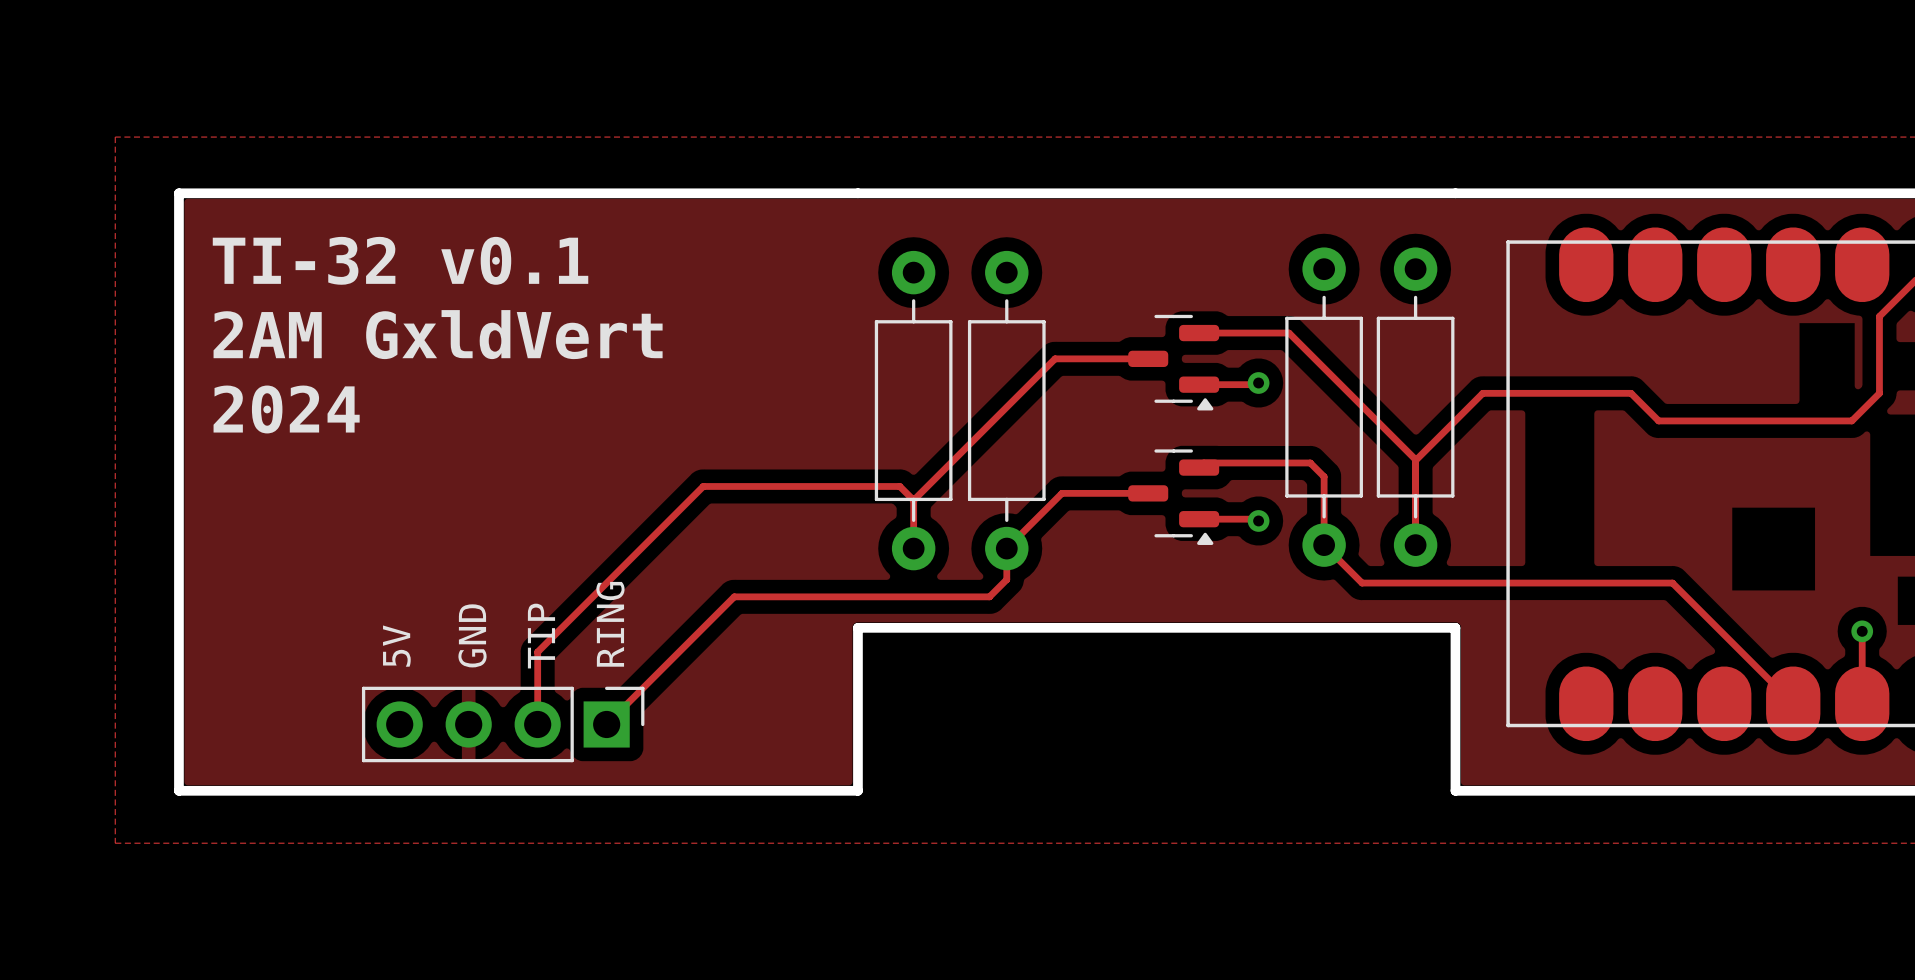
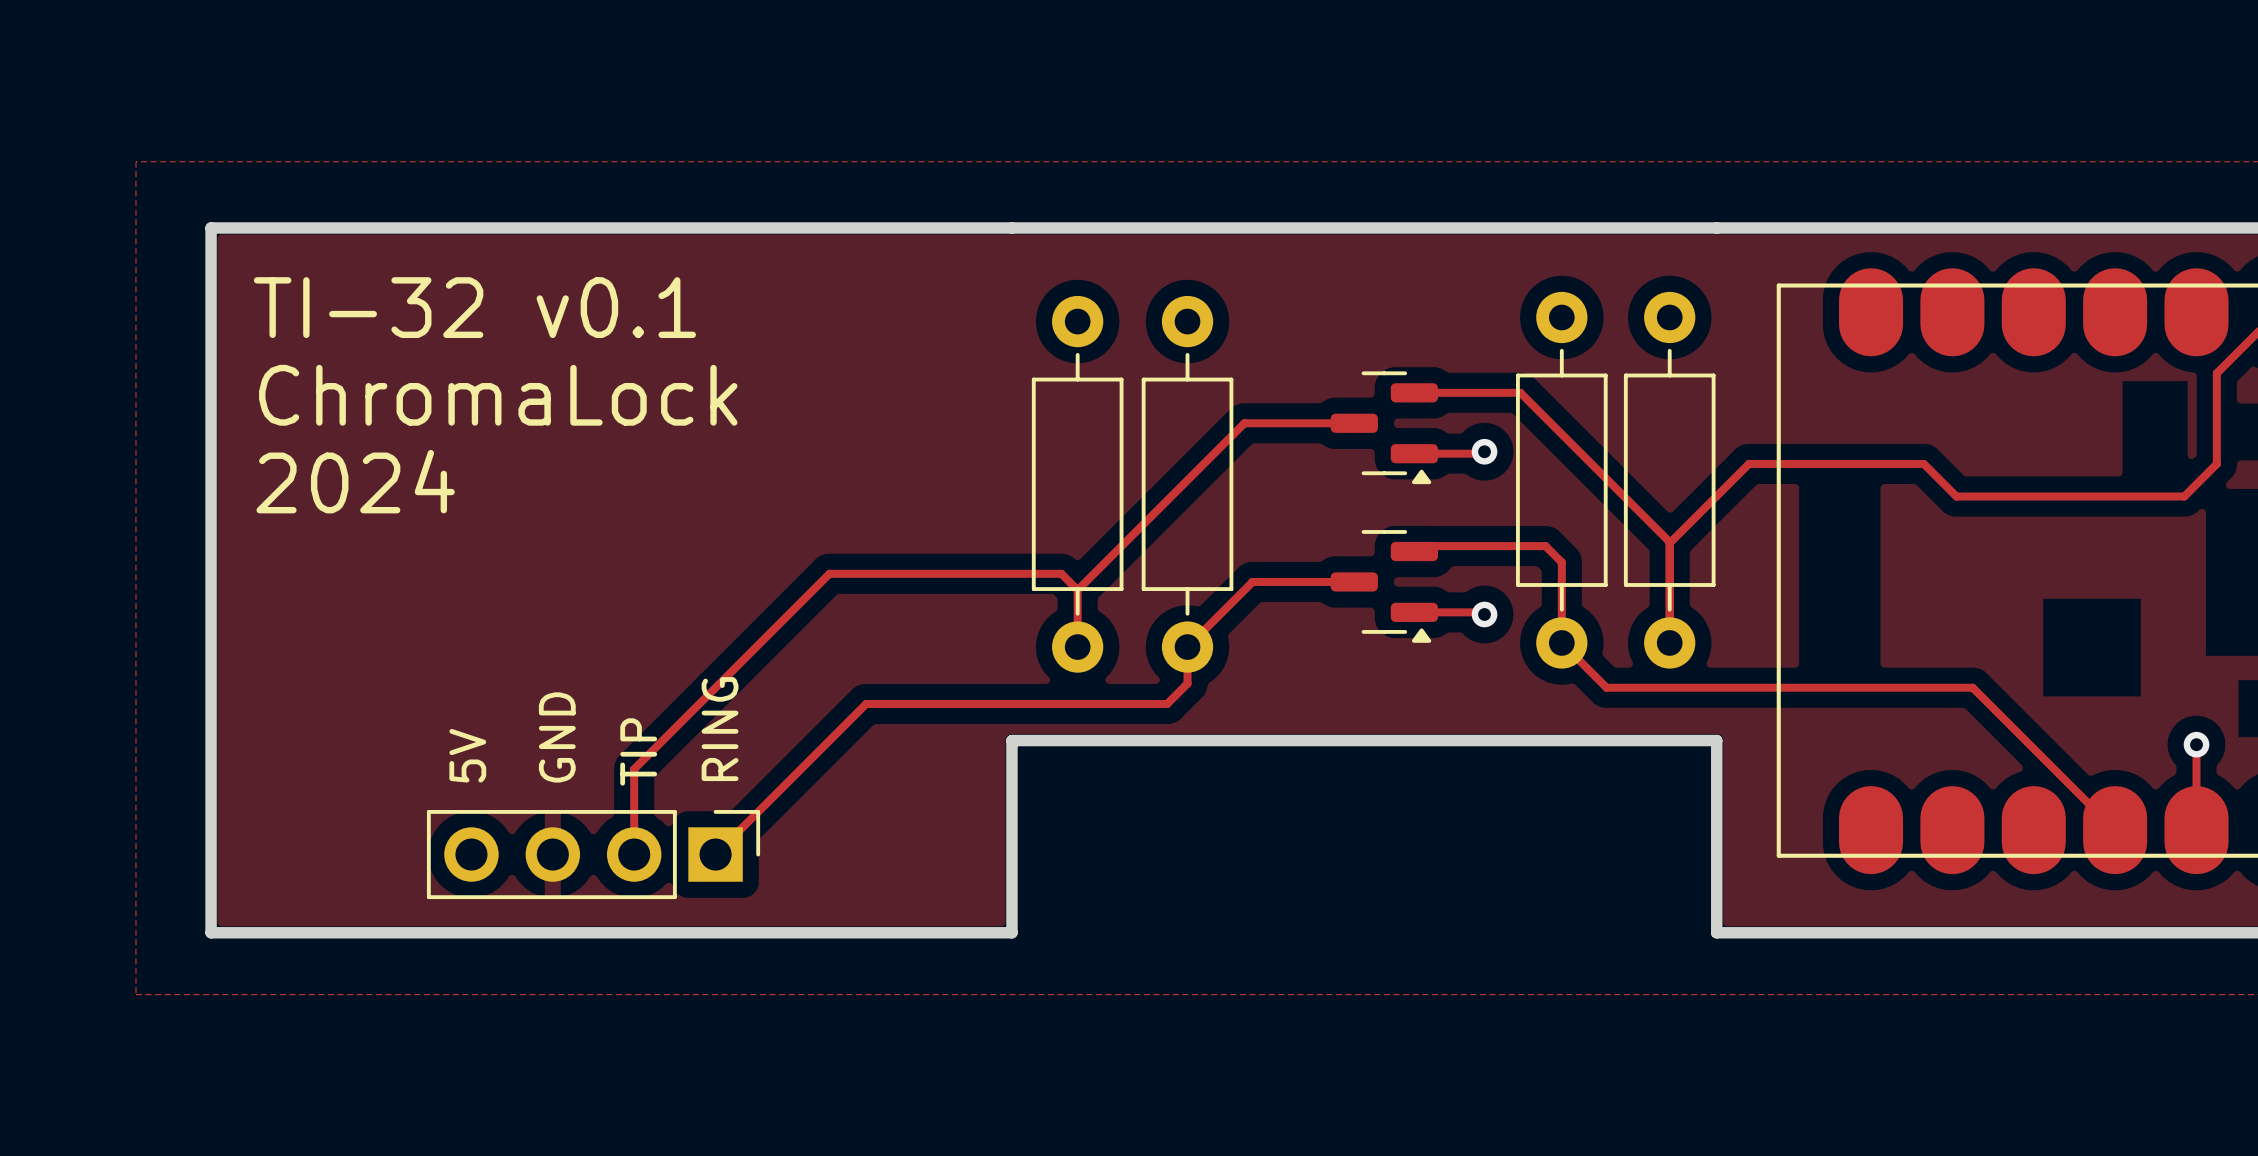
text: 2AM GxldVert (438, 334) -> ChromaLock (498, 395)

